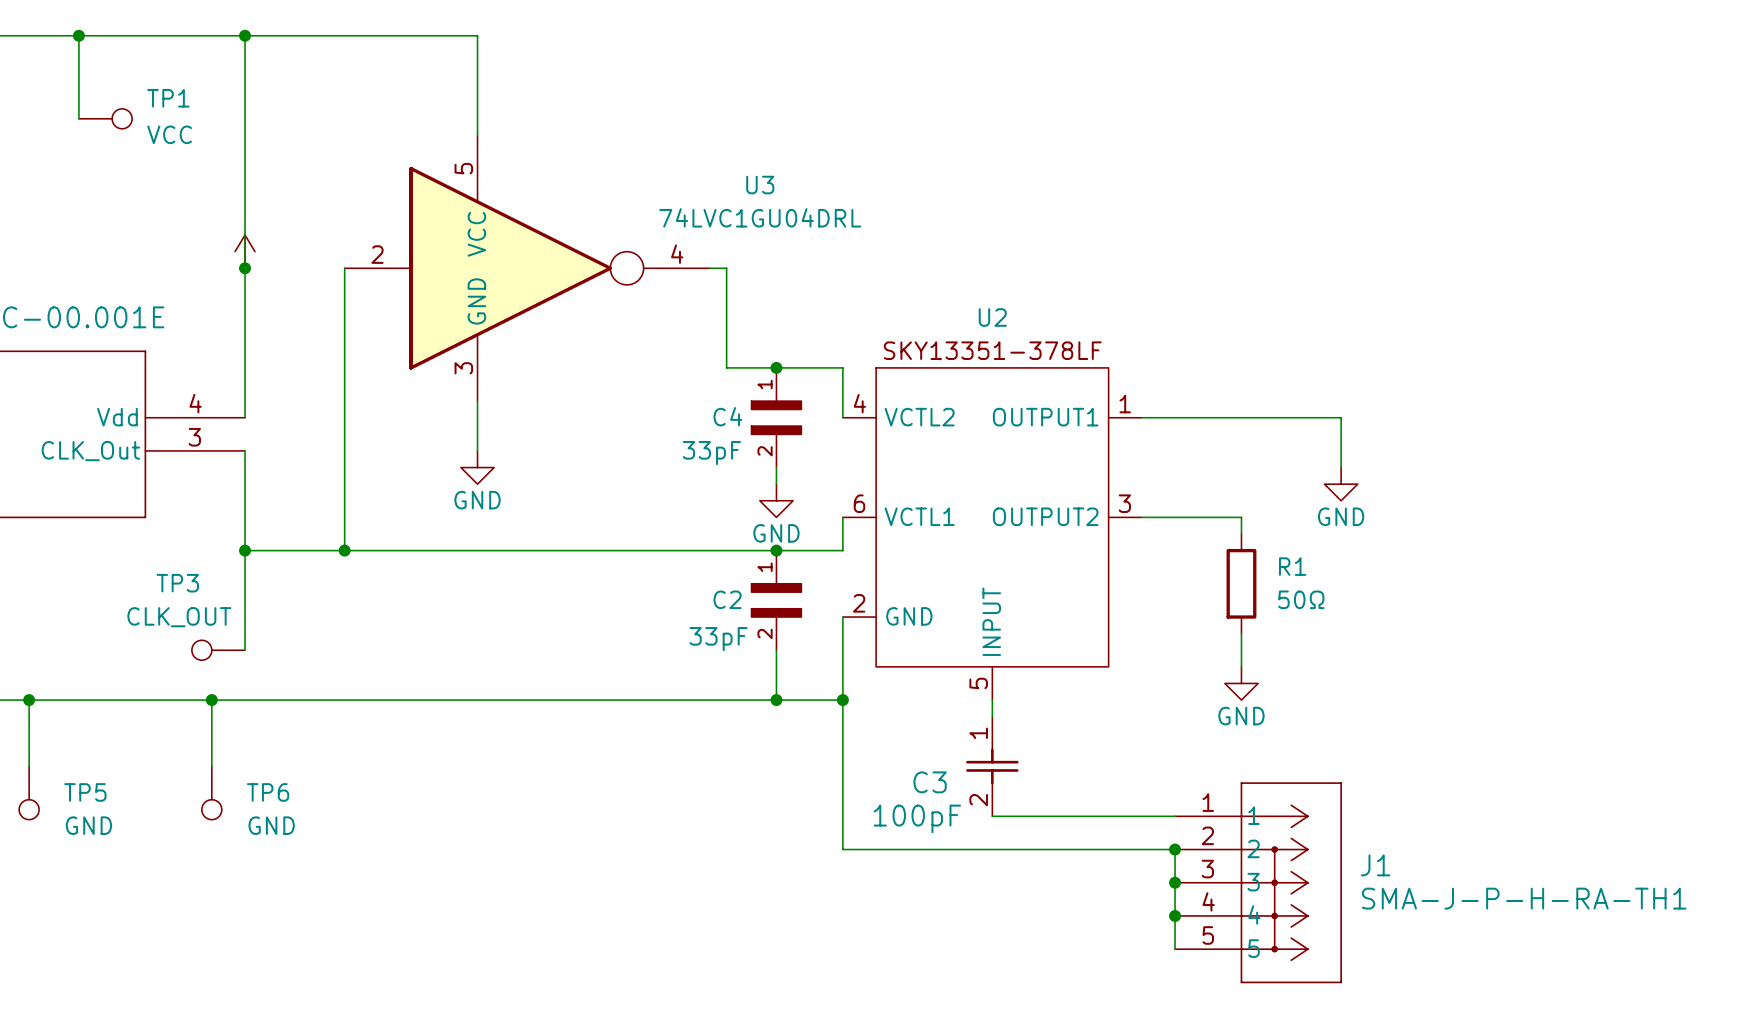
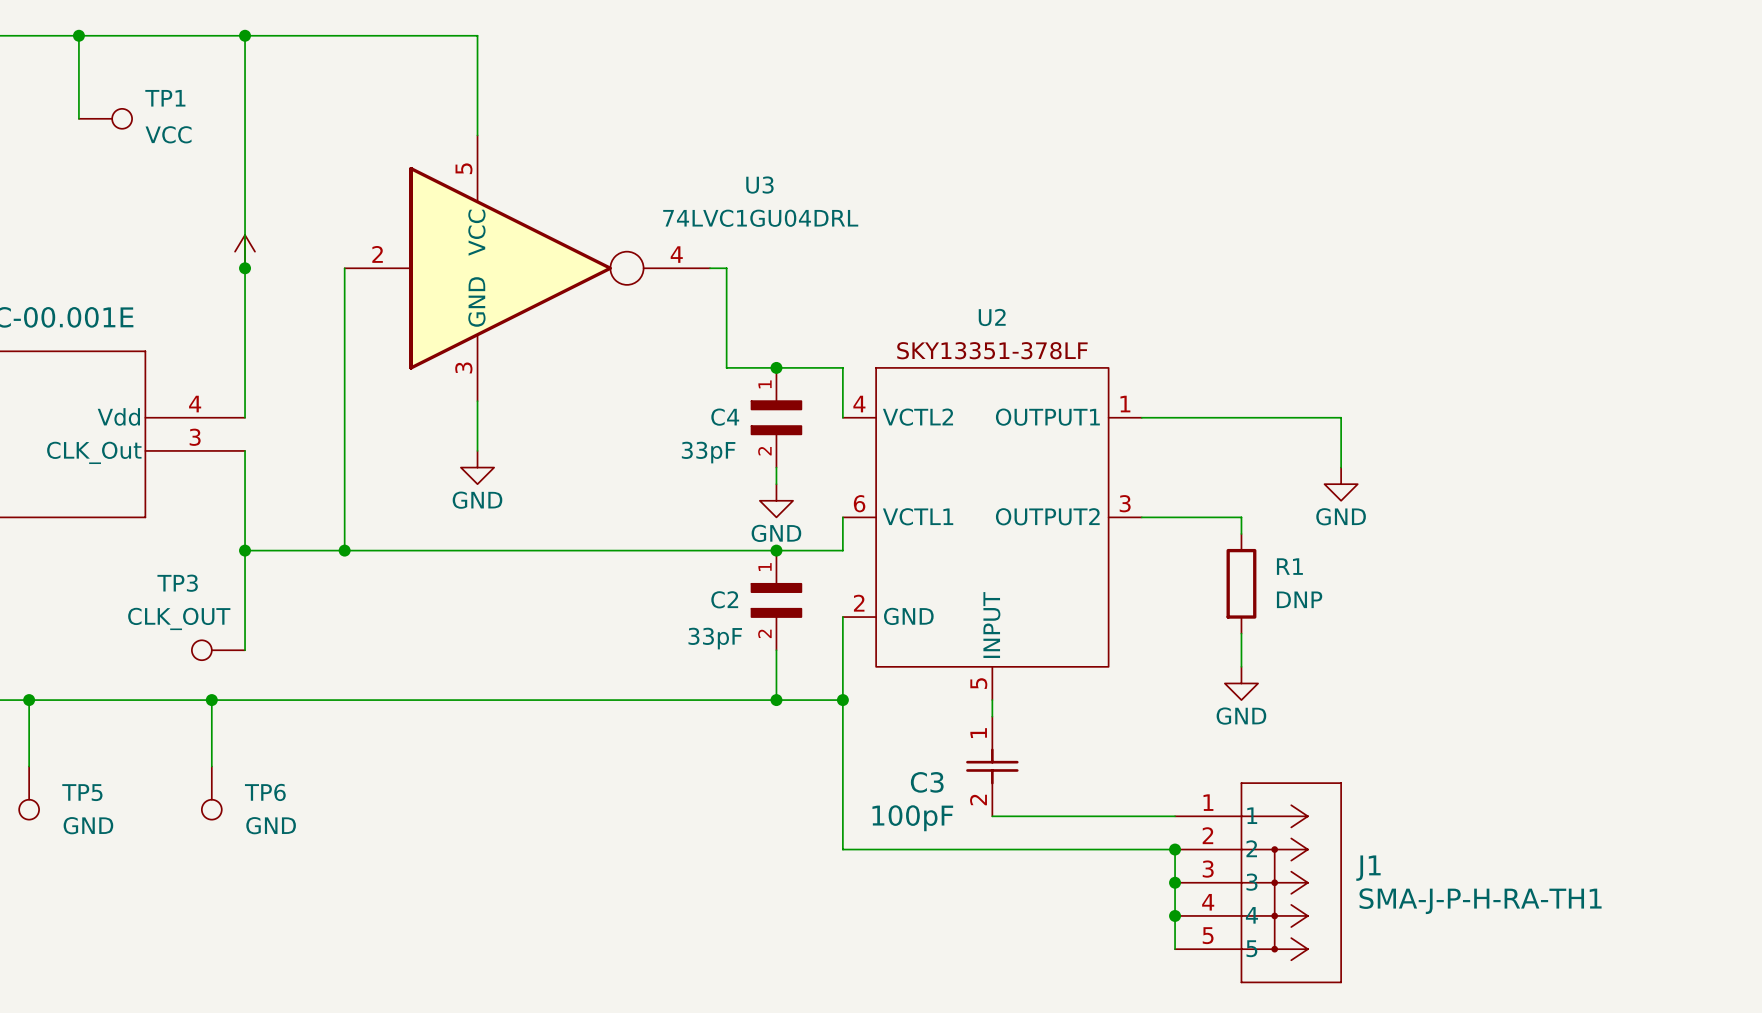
R1 value: 50Ω (1301, 599) -> DNP (1299, 599)

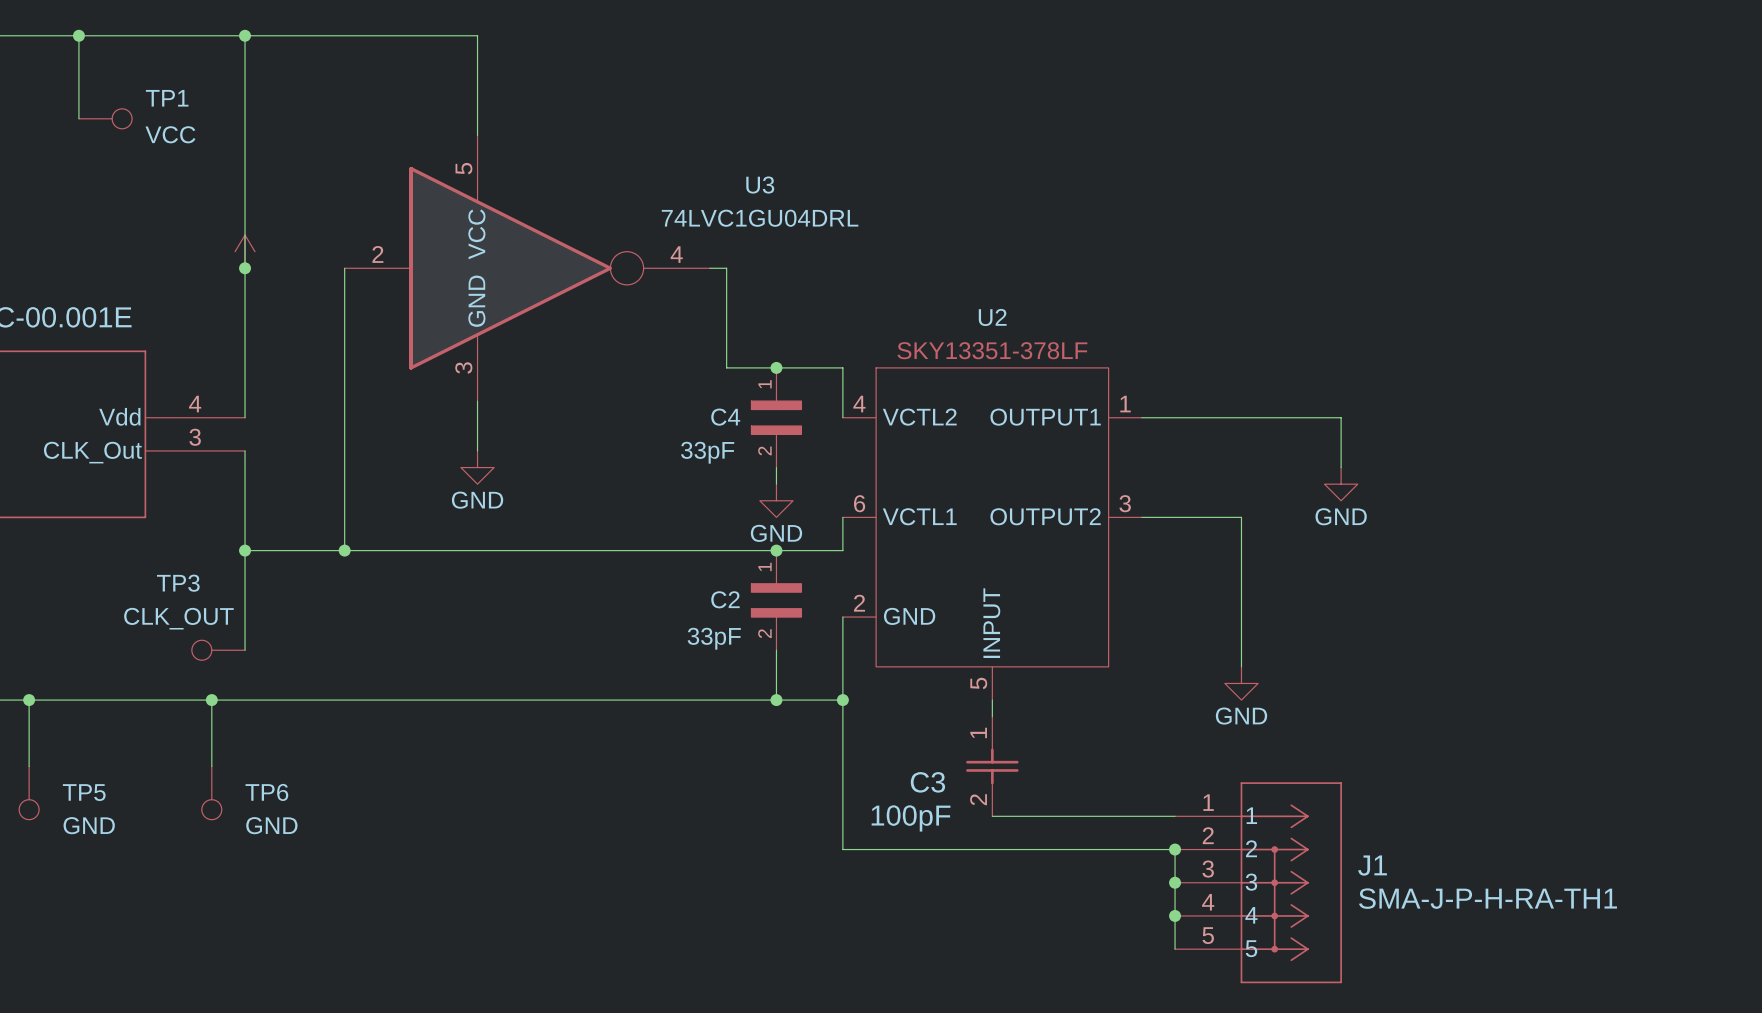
wire: none -> (1241, 533) (1241, 633)
R1: DNP (1241, 583) -> none

